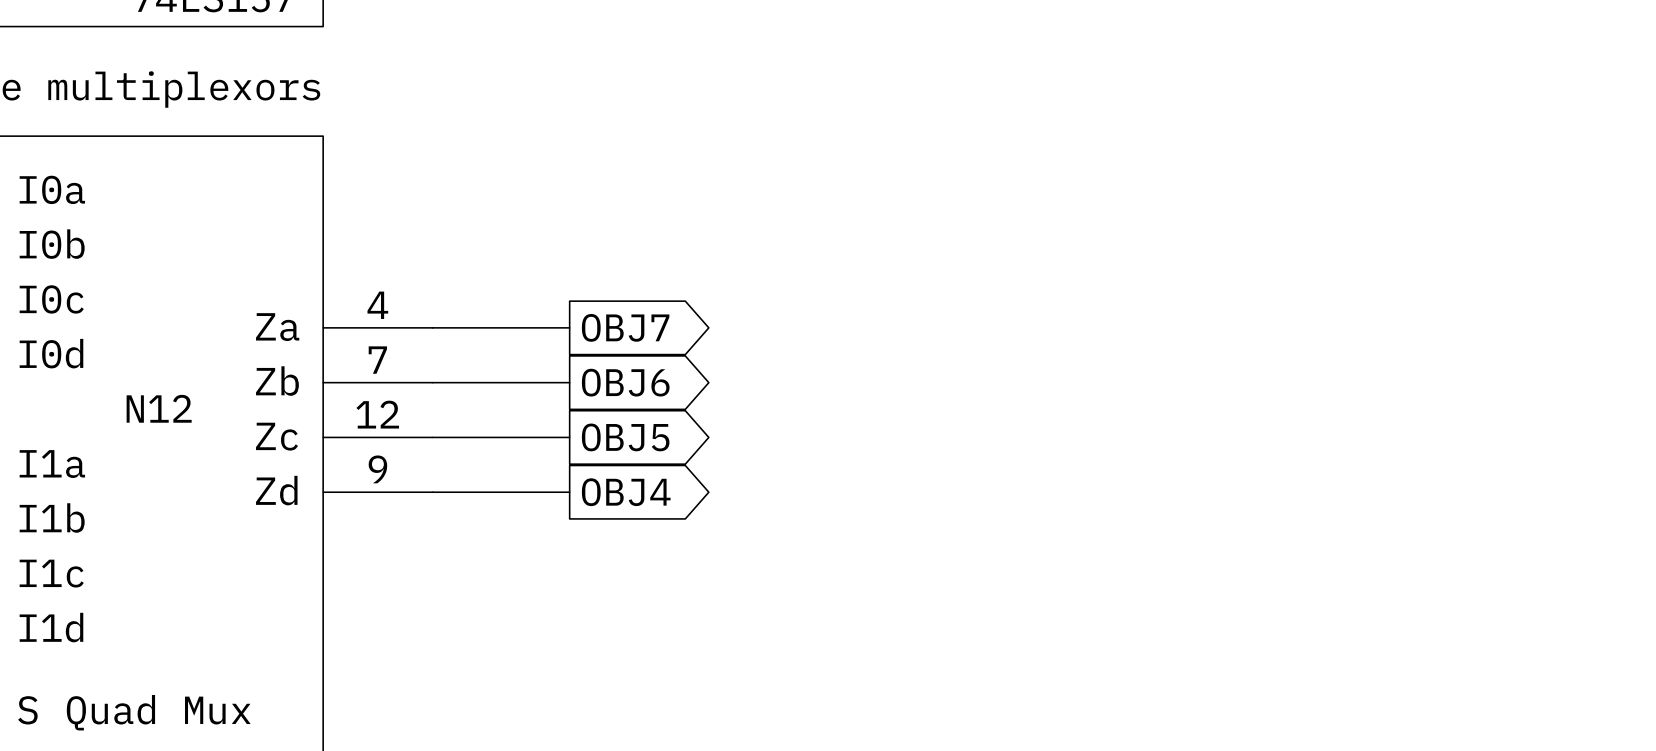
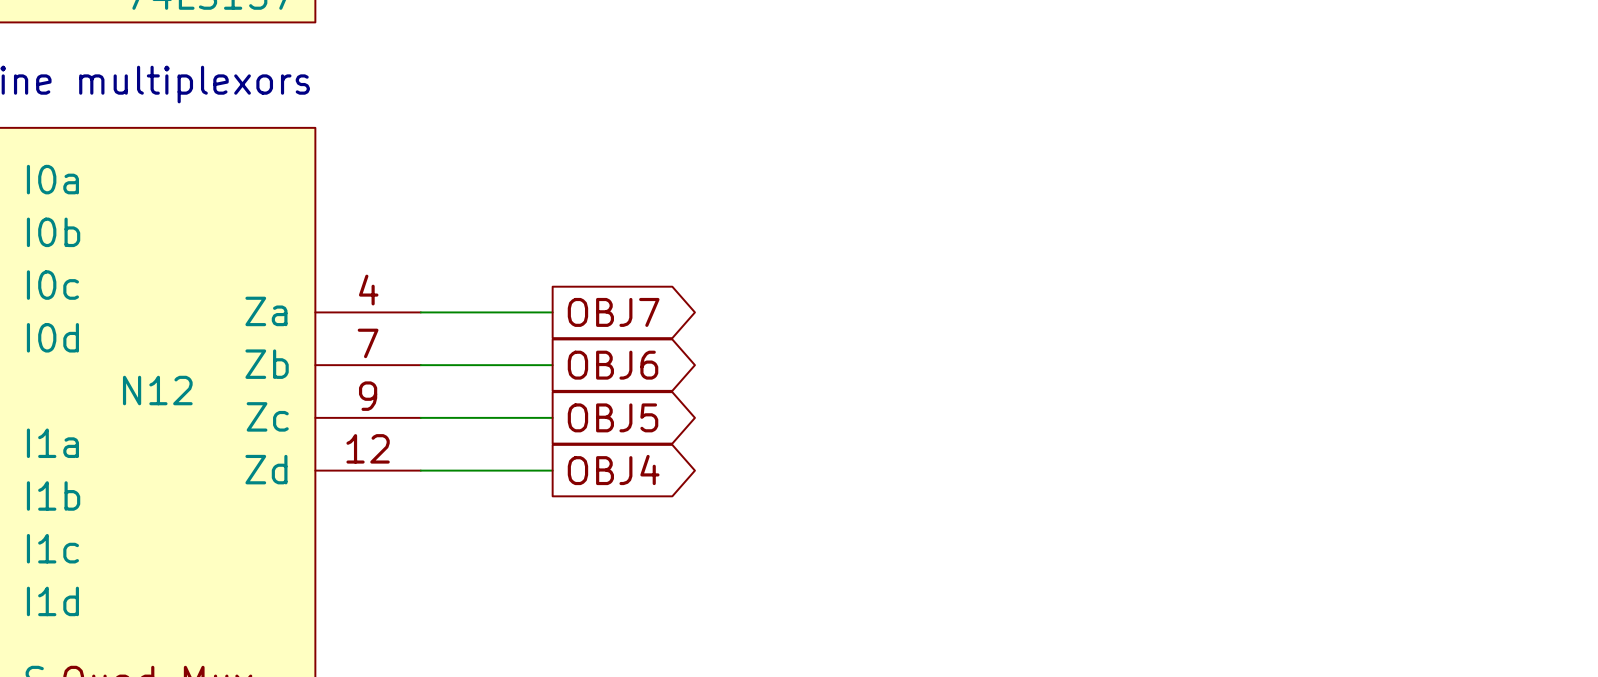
N12 pin number: 12 (377, 414) -> 9 (368, 396)
N12 pin number: 9 (377, 469) -> 12 (368, 448)

